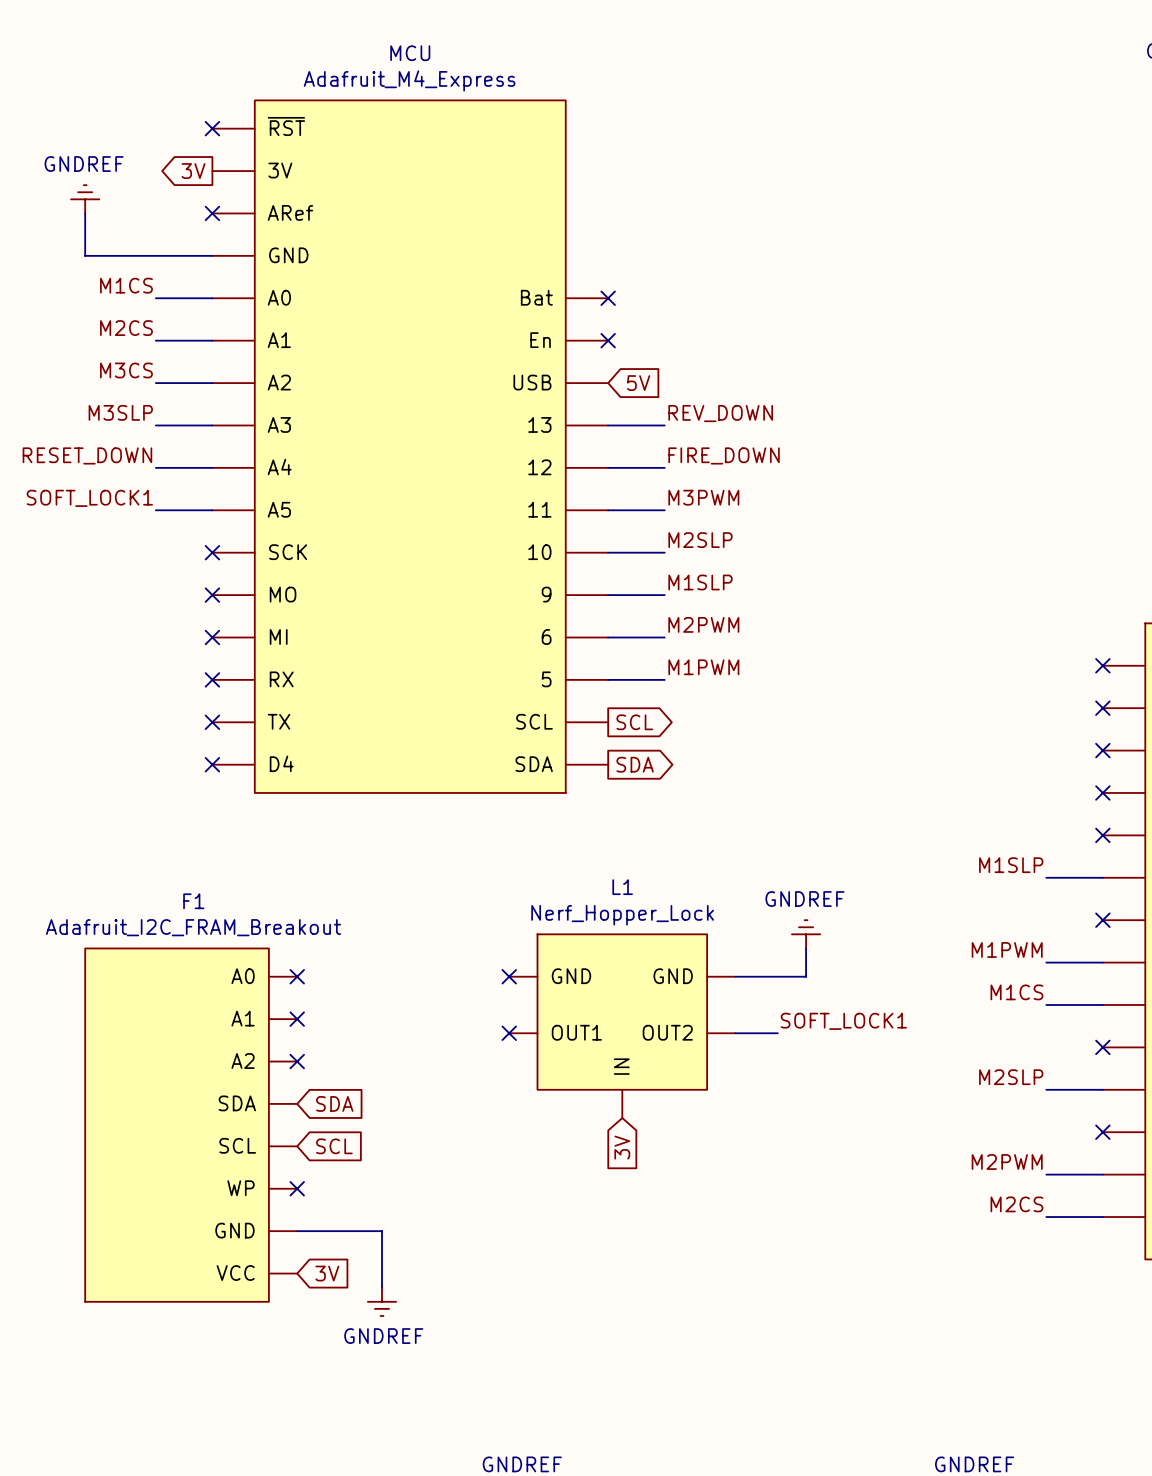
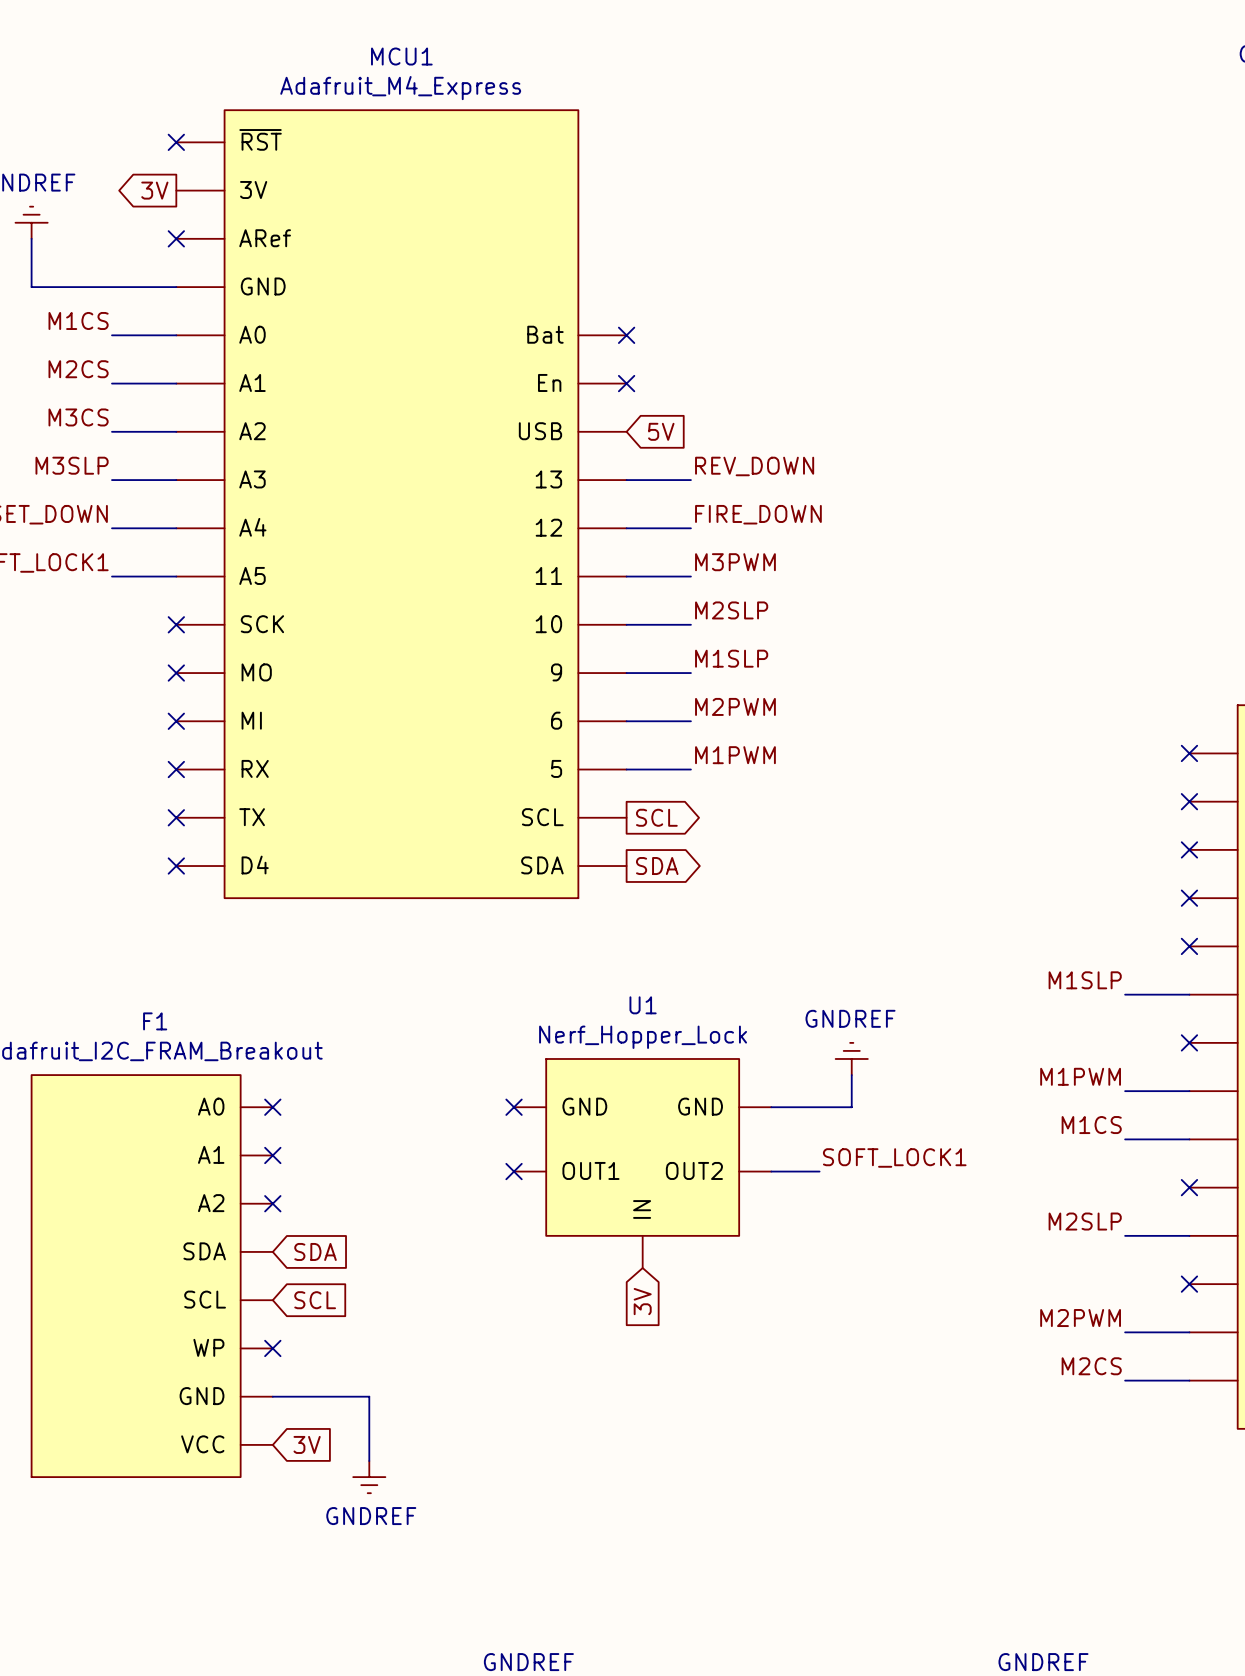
MCU name: MCU (410, 53) -> MCU1 (401, 56)
L1 name: L1 (622, 887) -> U1 (643, 1005)

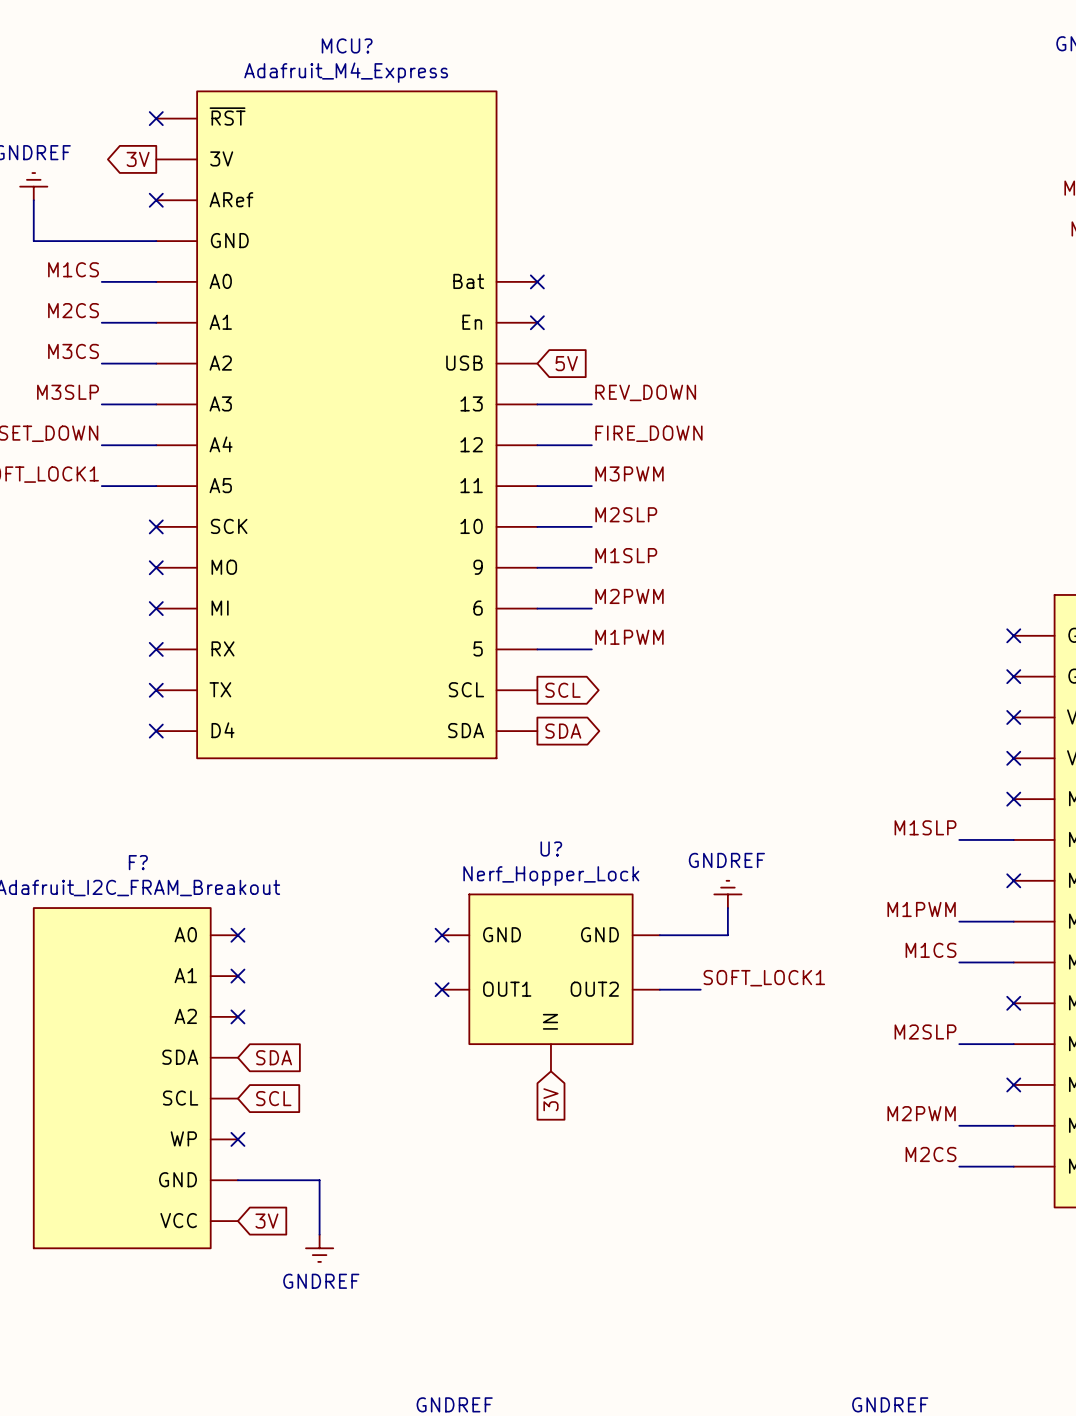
MCU1 name: MCU1 (401, 56) -> MCU? (347, 45)
U1 name: U1 (643, 1005) -> U? (551, 848)
F1 name: F1 (155, 1021) -> F? (138, 862)

